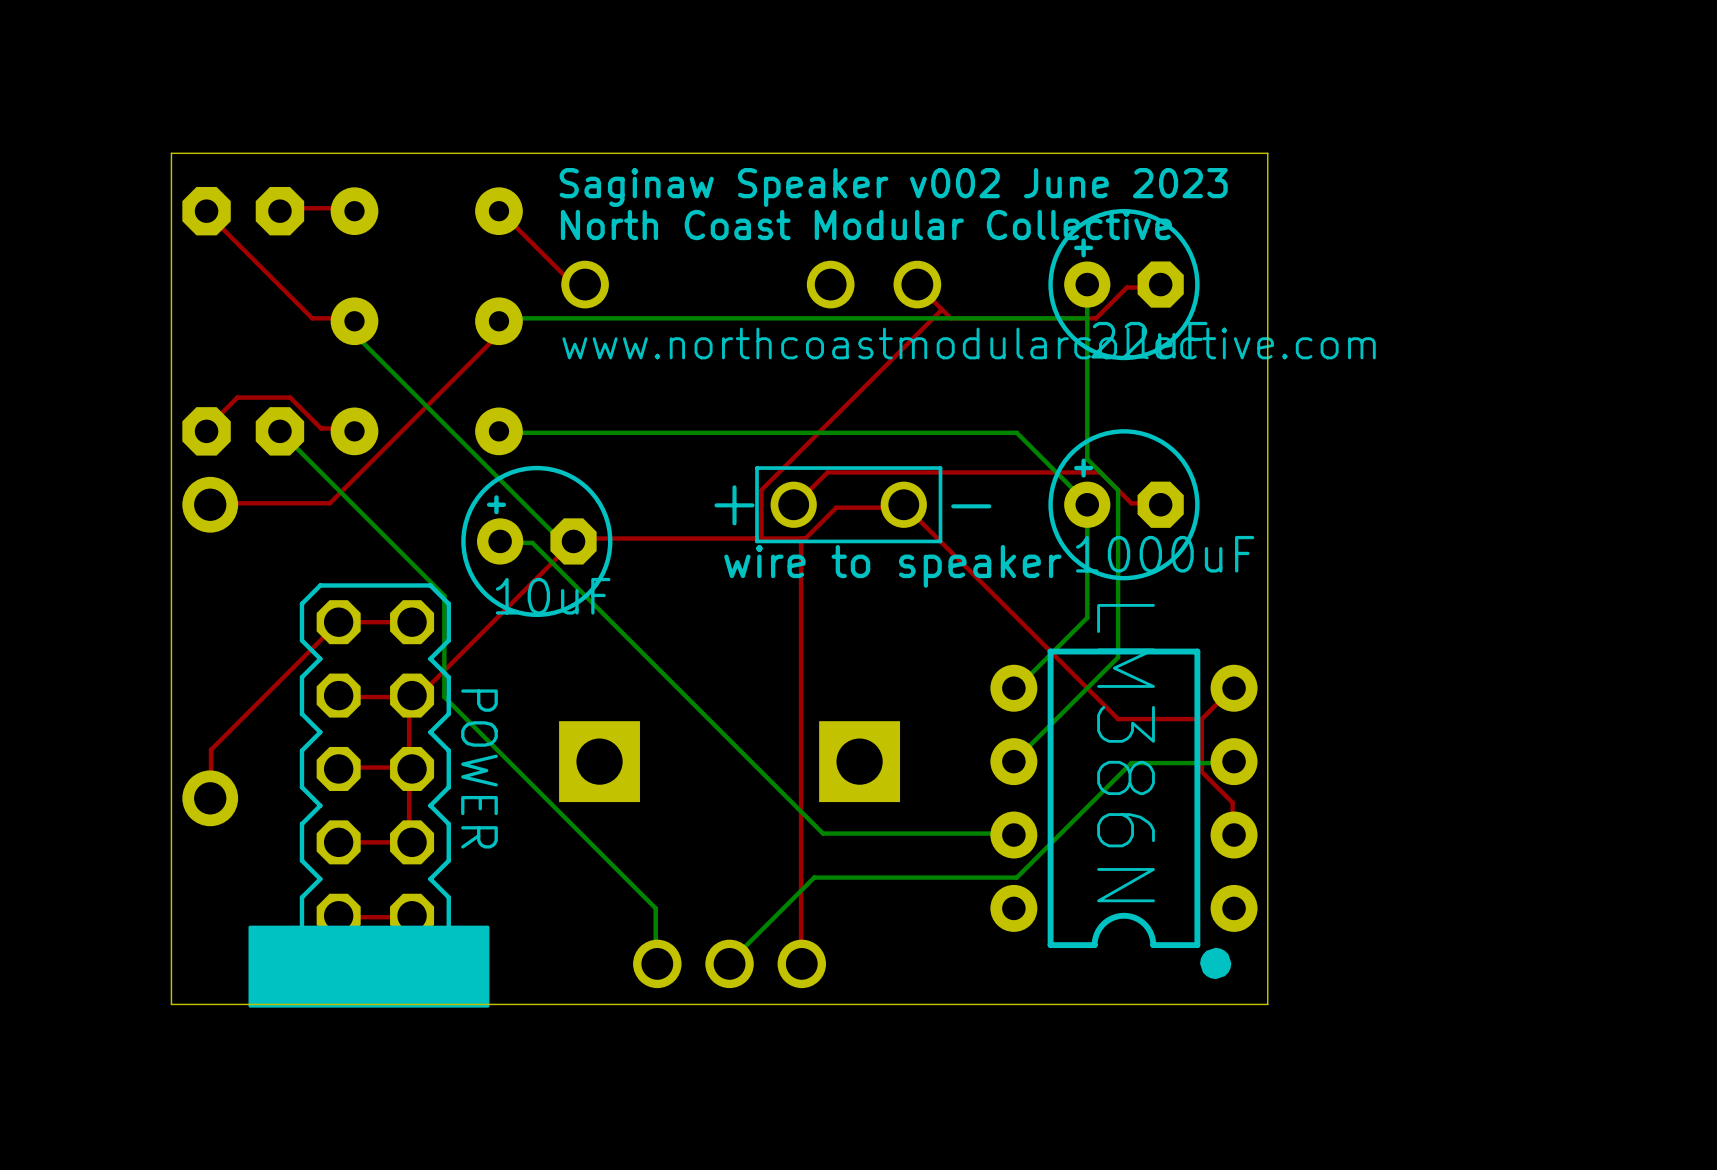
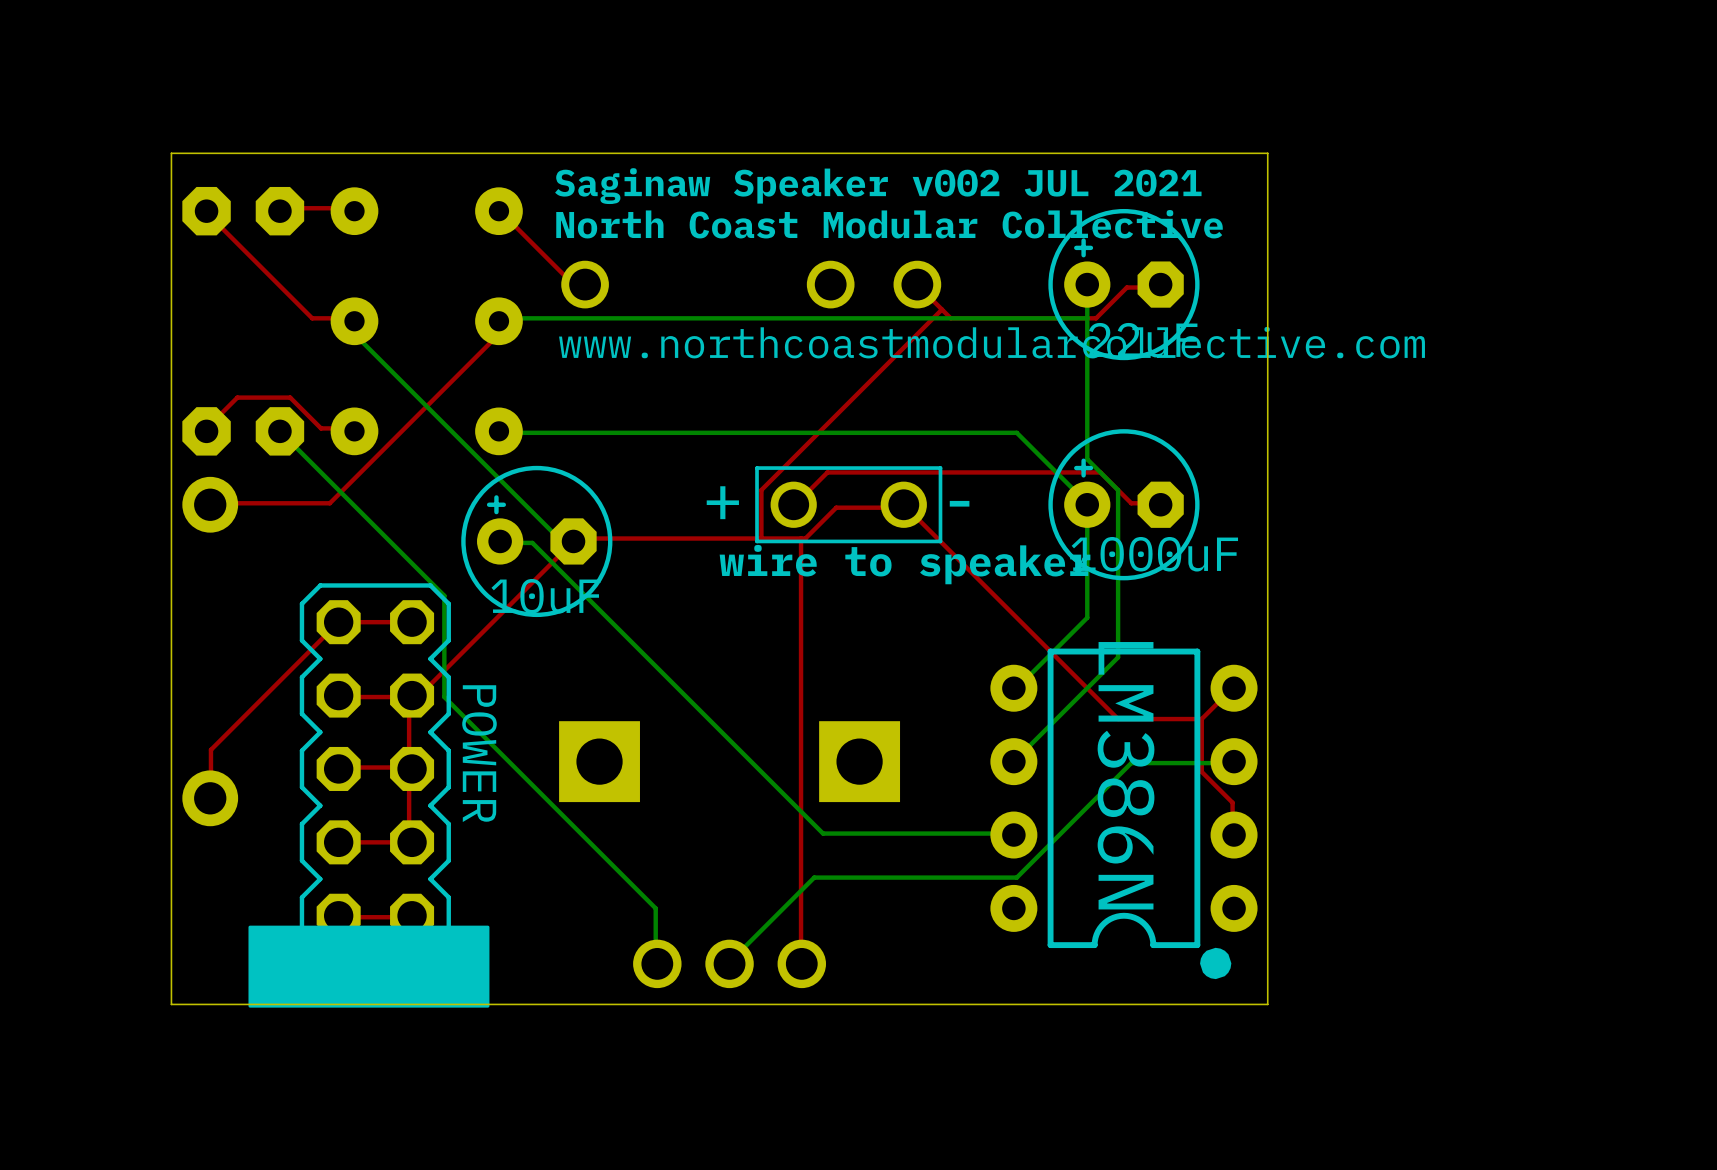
text: Saginaw Speaker v002 June 2023 (893, 187) -> Saginaw Speaker v002 JUL 2021 (878, 186)

